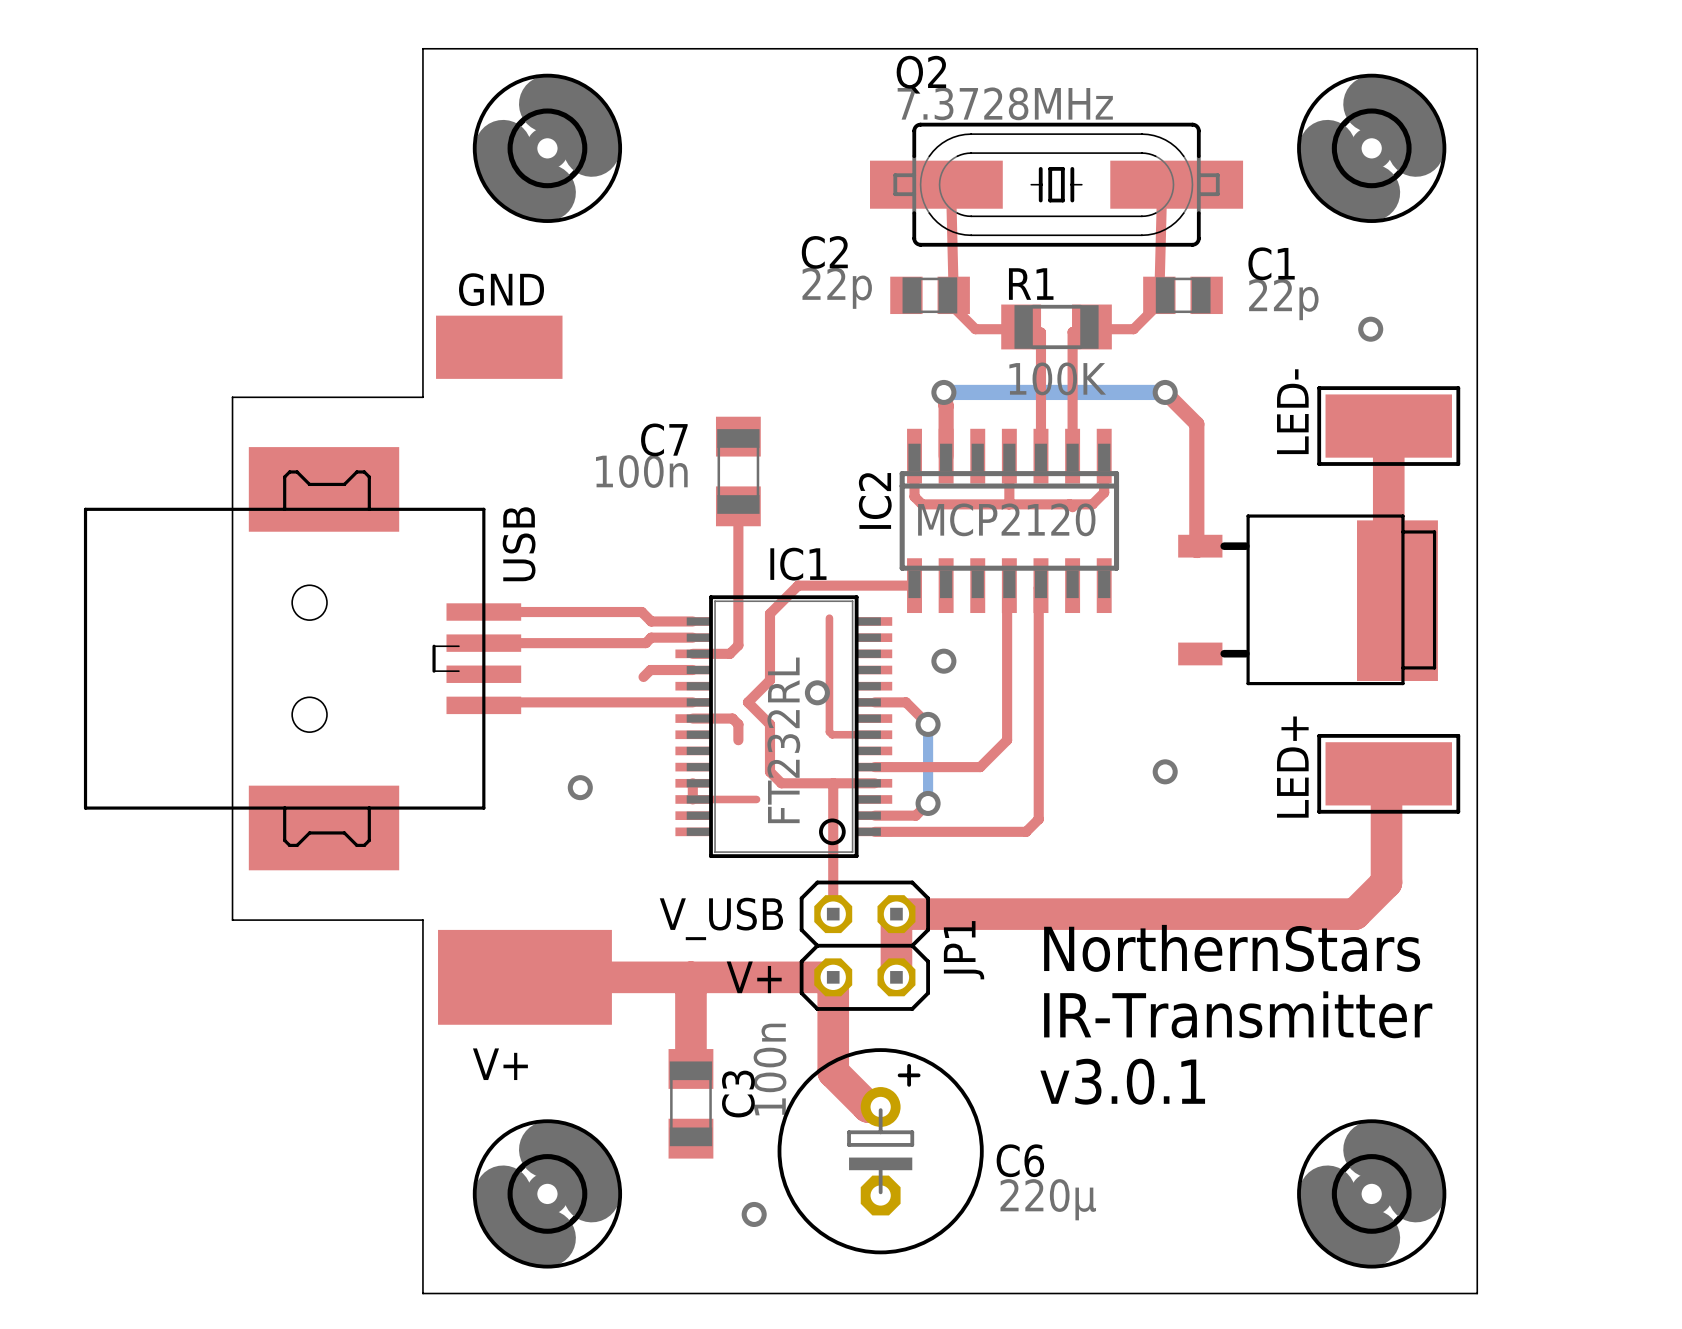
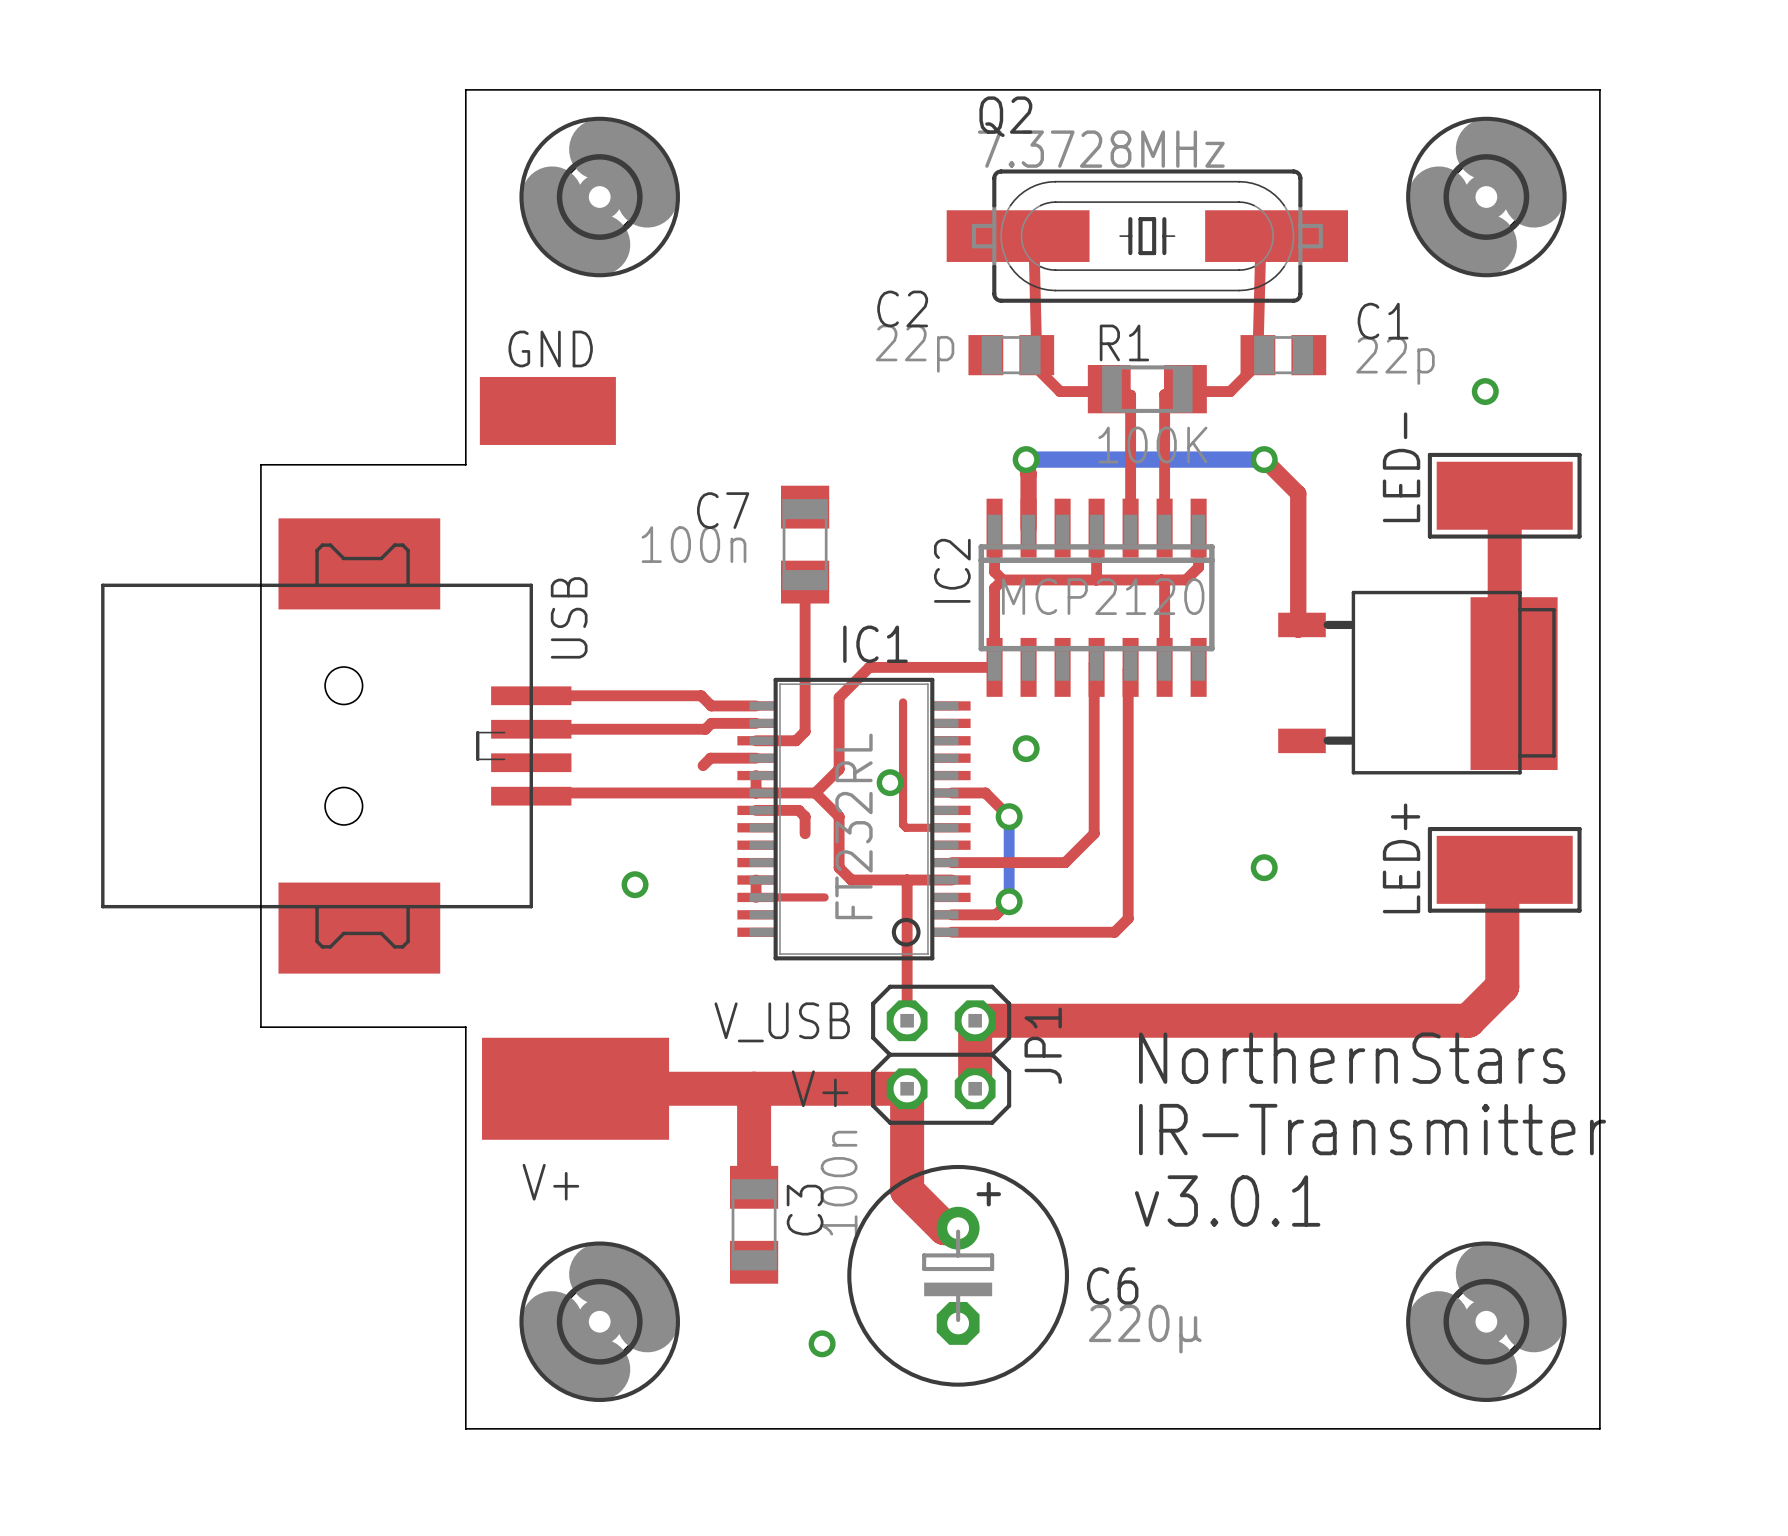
top track: none -> (1002, 579) (994, 588) (994, 667)
top track: none -> (1164, 583) (1164, 667)
top track: none -> (756, 775) (756, 792) (815, 792)

